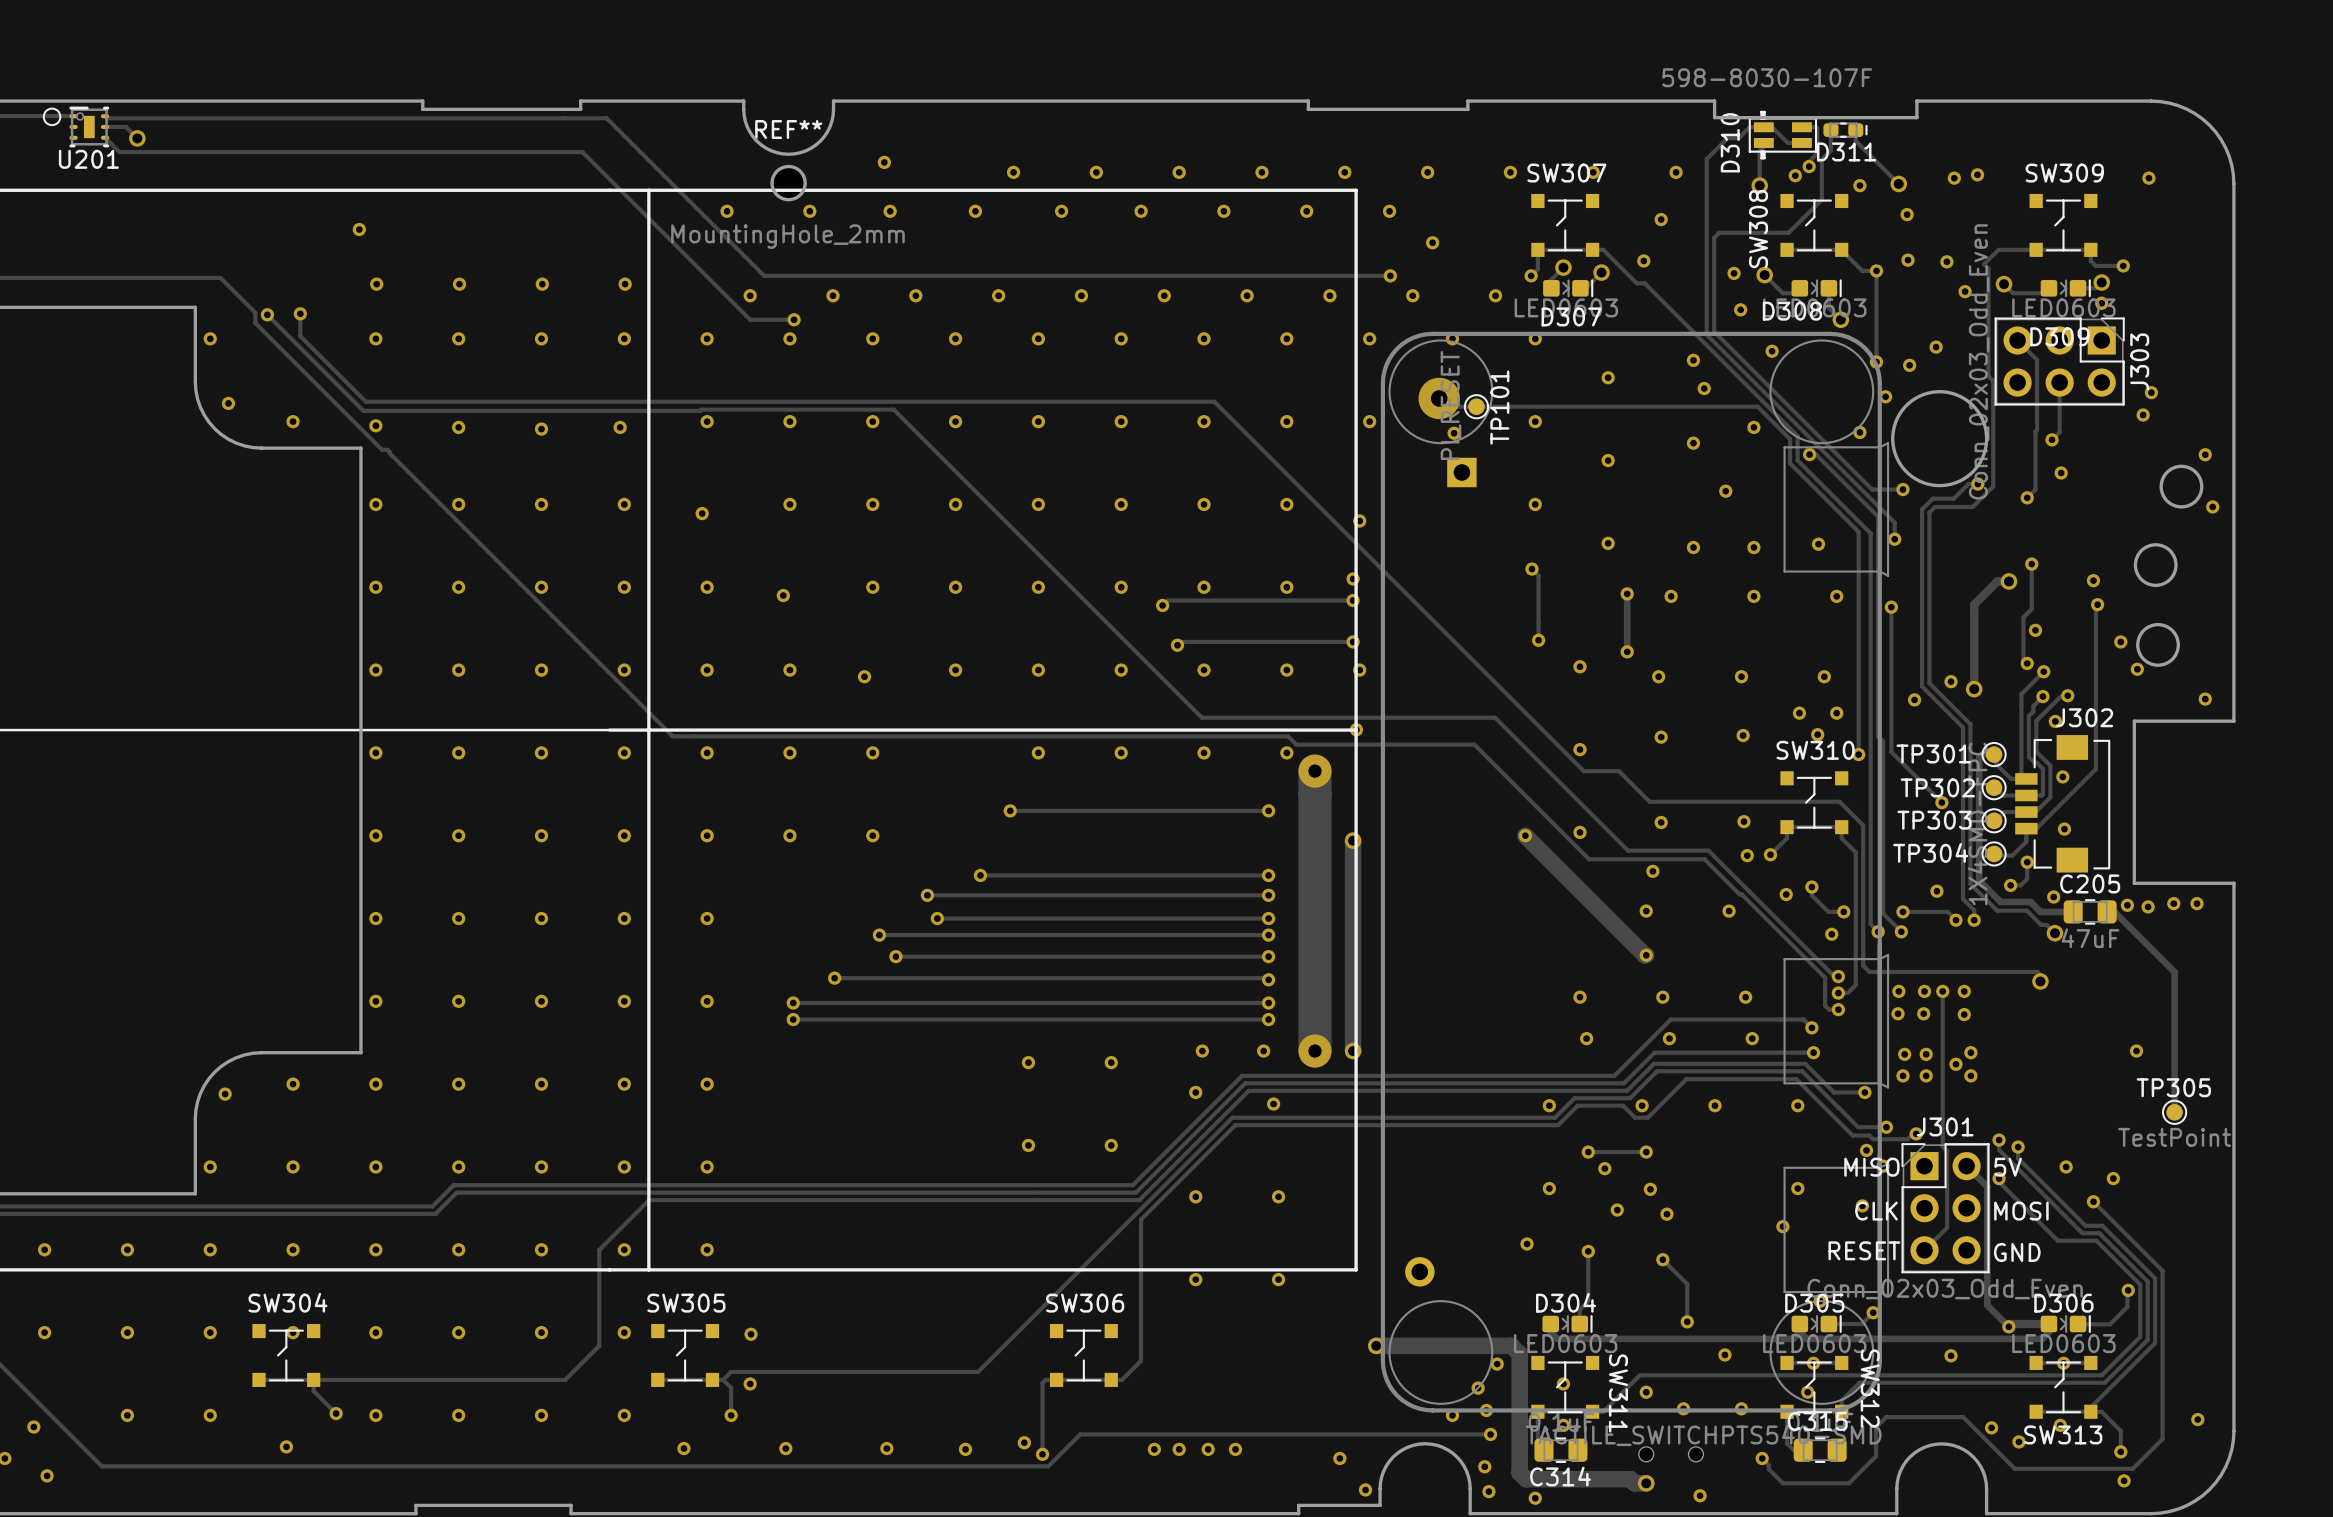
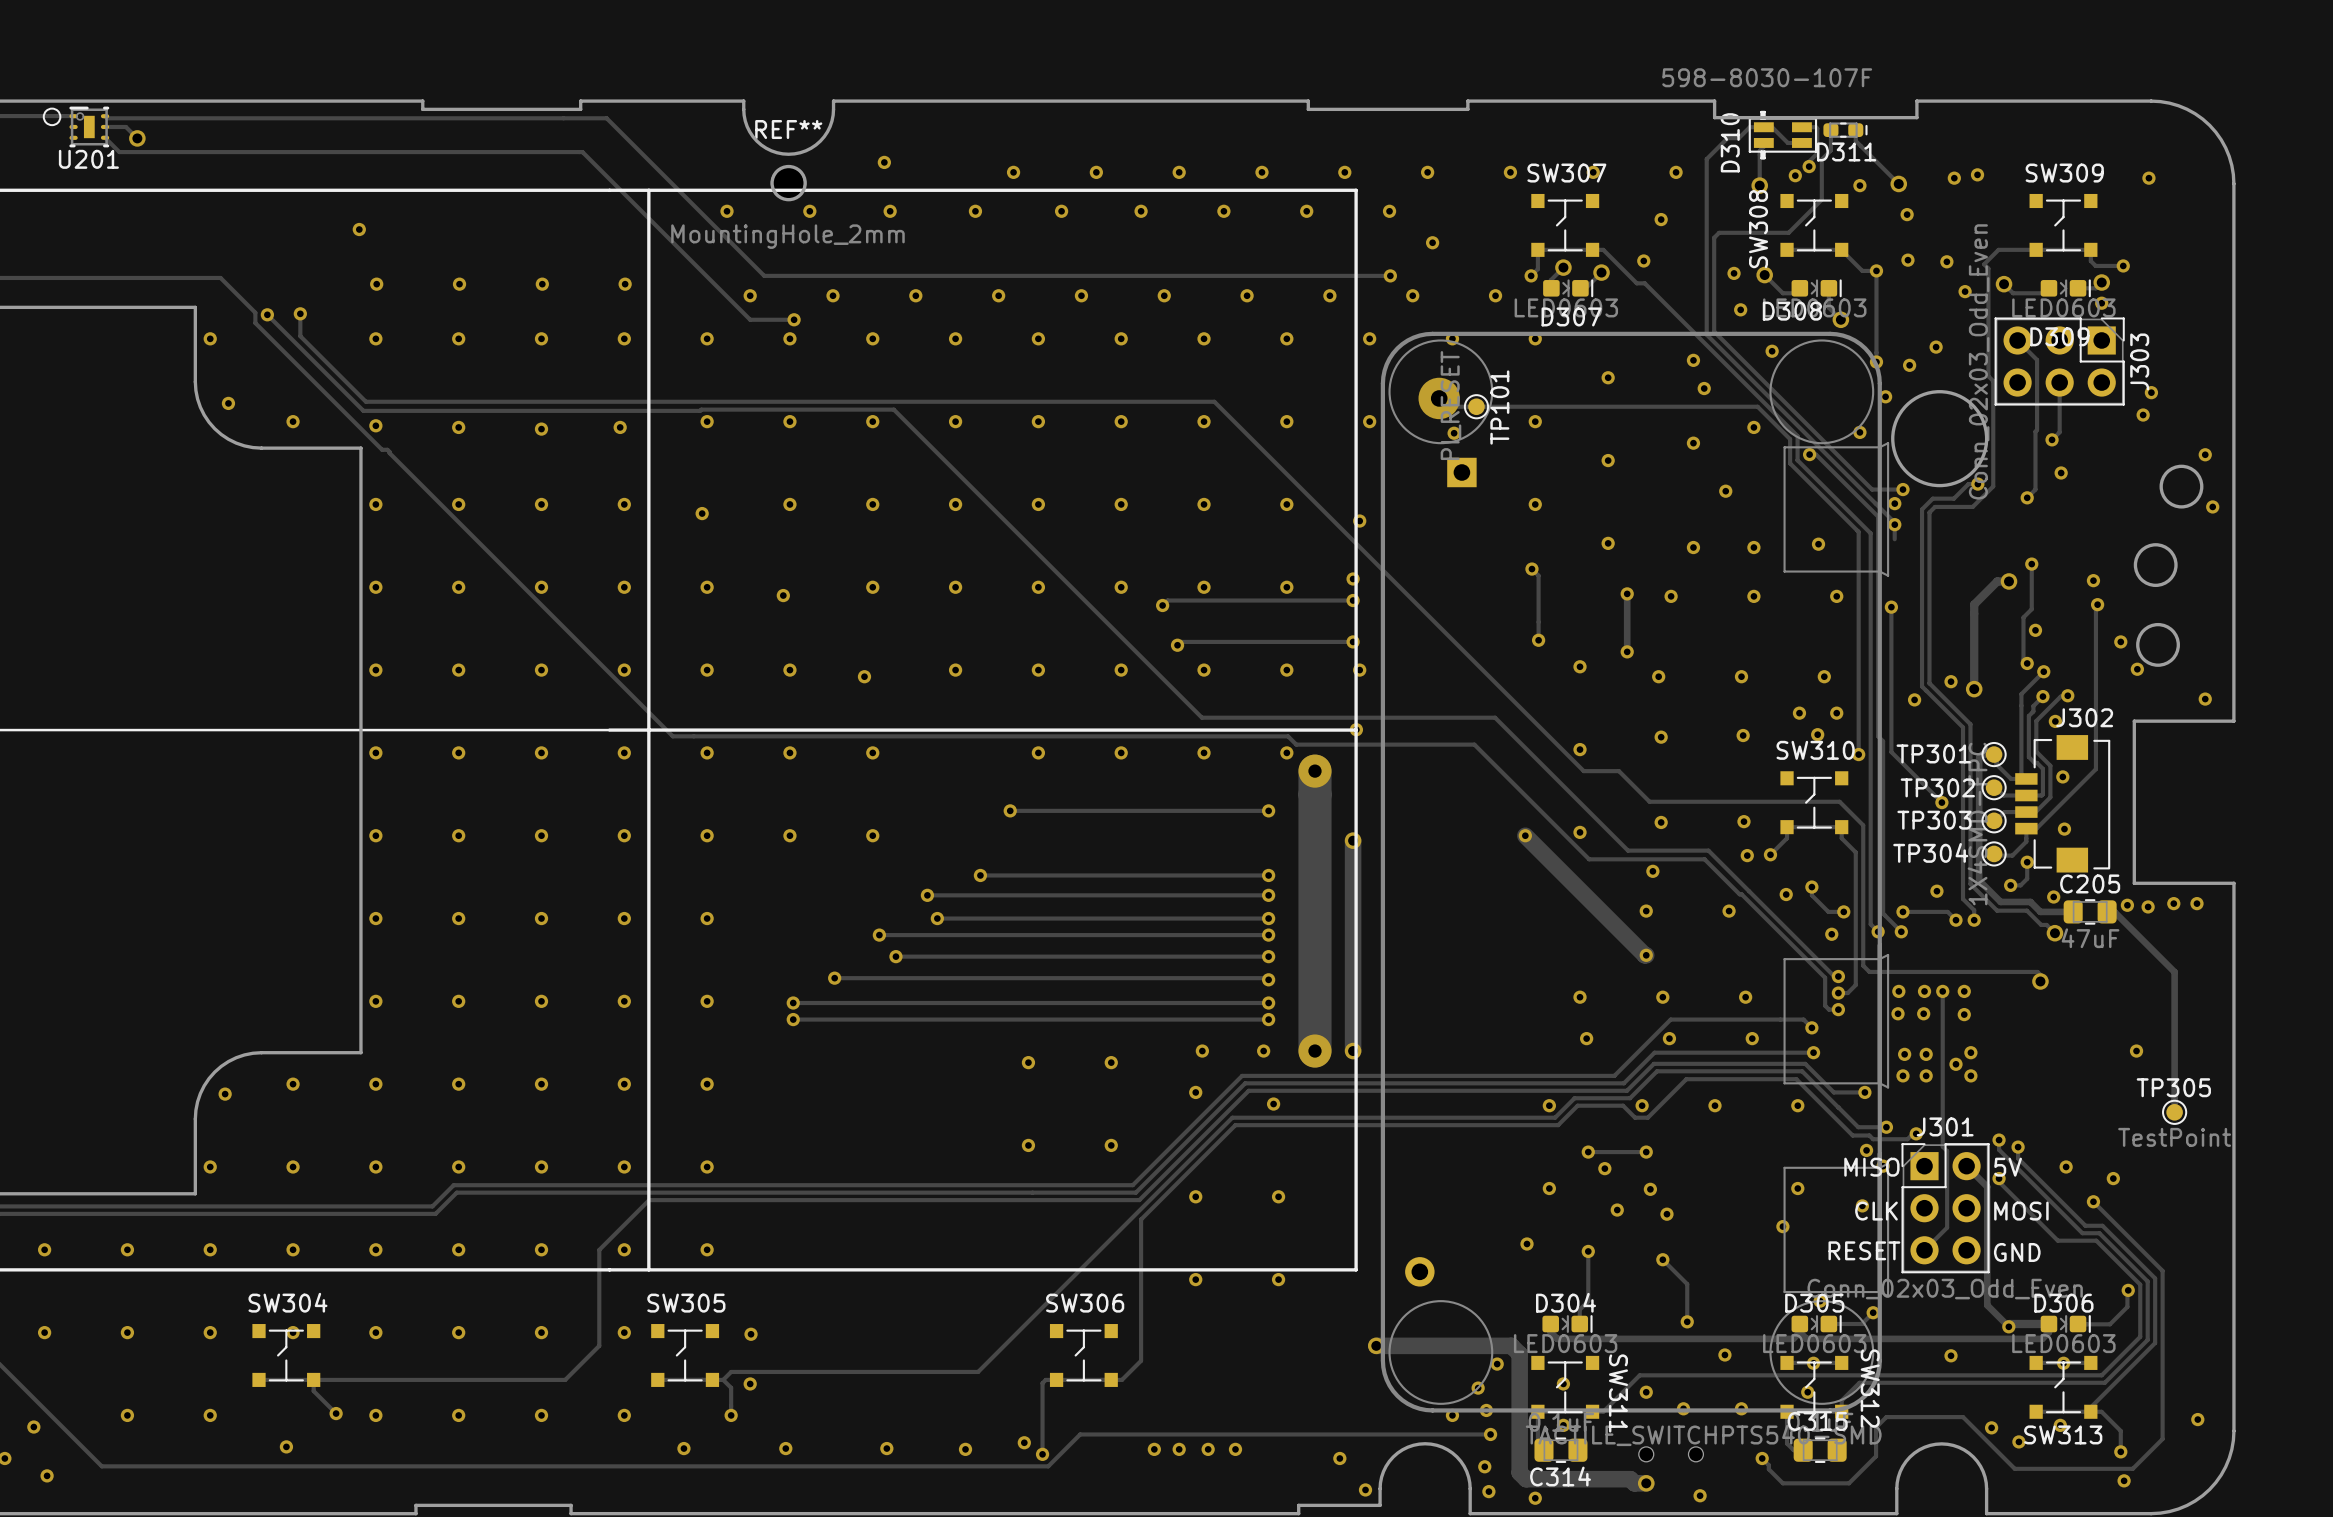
via: none -> (1894, 503)
via position: (1894, 539) -> (1894, 524)

